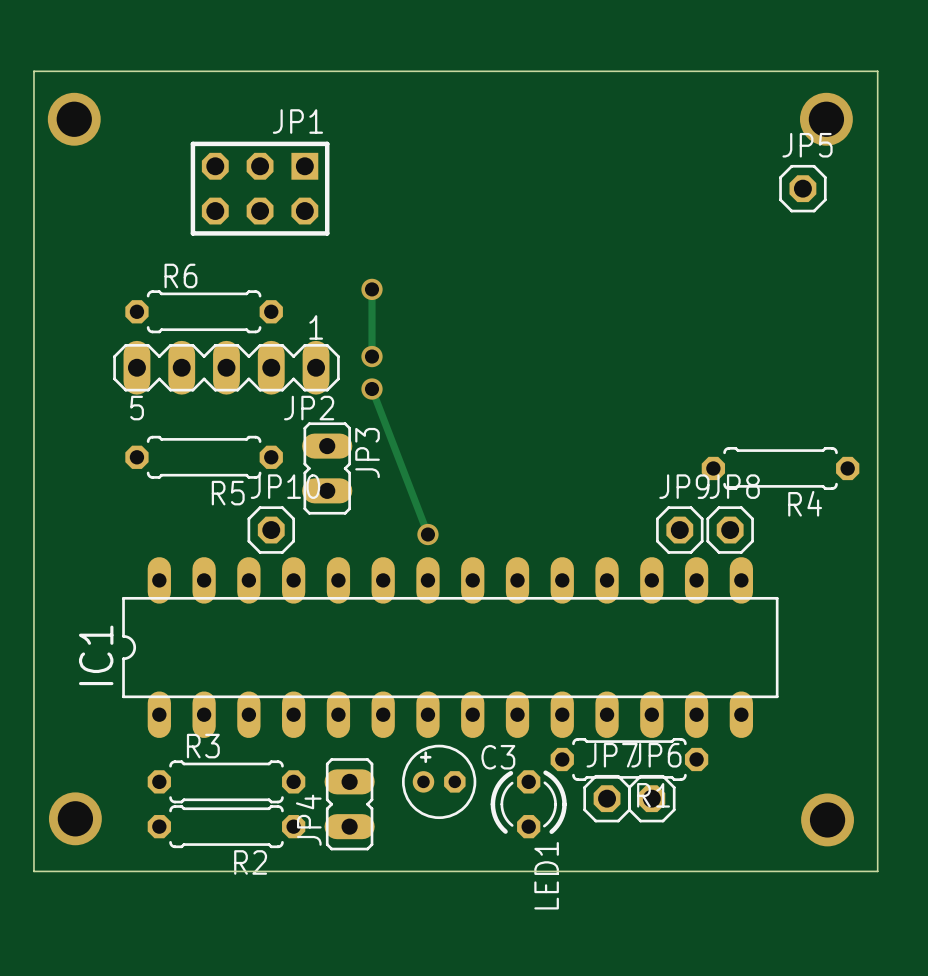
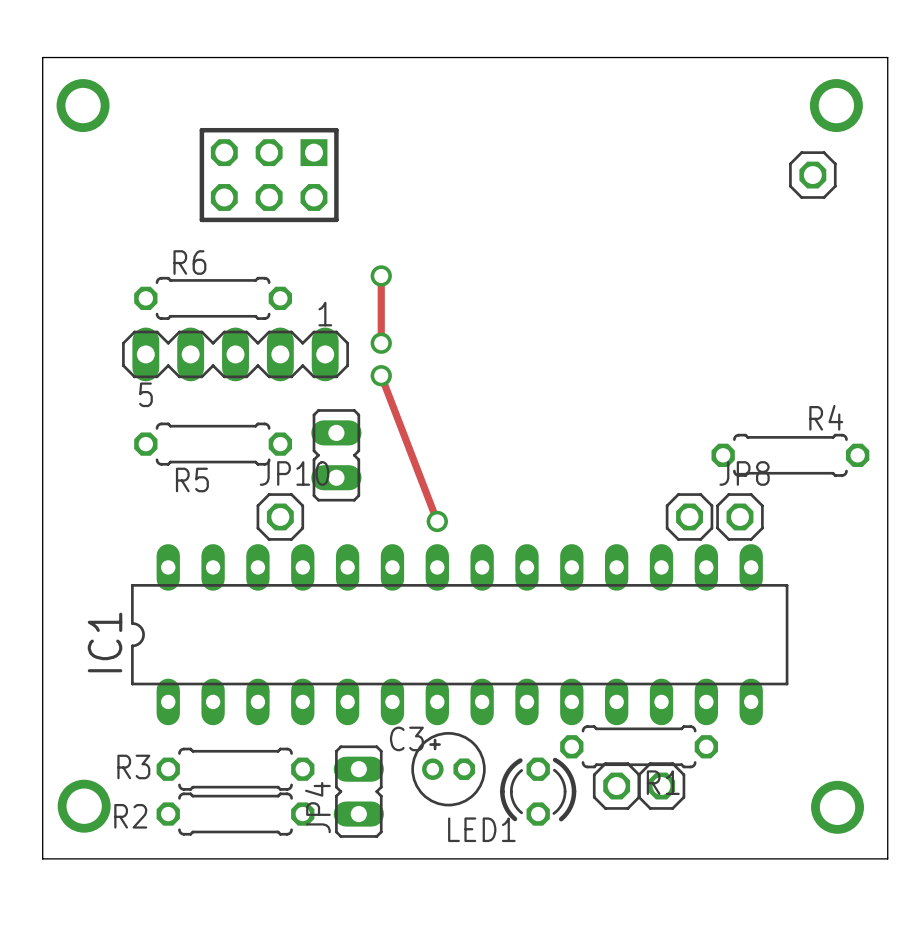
JP1 name: JP1 (297, 121) -> none
JP5 name: JP5 (807, 145) -> none
JP2 name: JP2 (309, 408) -> none
JP3 name: JP3 (367, 453) -> none
JP9 name: JP9 (684, 486) -> none
R5 name position: R5 (228, 493) -> R5 (192, 479)
R4 name position: R4 (805, 503) -> R4 (826, 417)
R3 name position: R3 (203, 746) -> R3 (133, 766)
JP7 name: JP7 (612, 755) -> none
JP6 name: JP6 (656, 755) -> none
C3 name position: C3 (498, 757) -> C3 (406, 738)
R2 name position: R2 (250, 862) -> R2 (130, 816)
LED1 name rotation: 0° (546, 875) -> 90° clockwise (481, 829)

